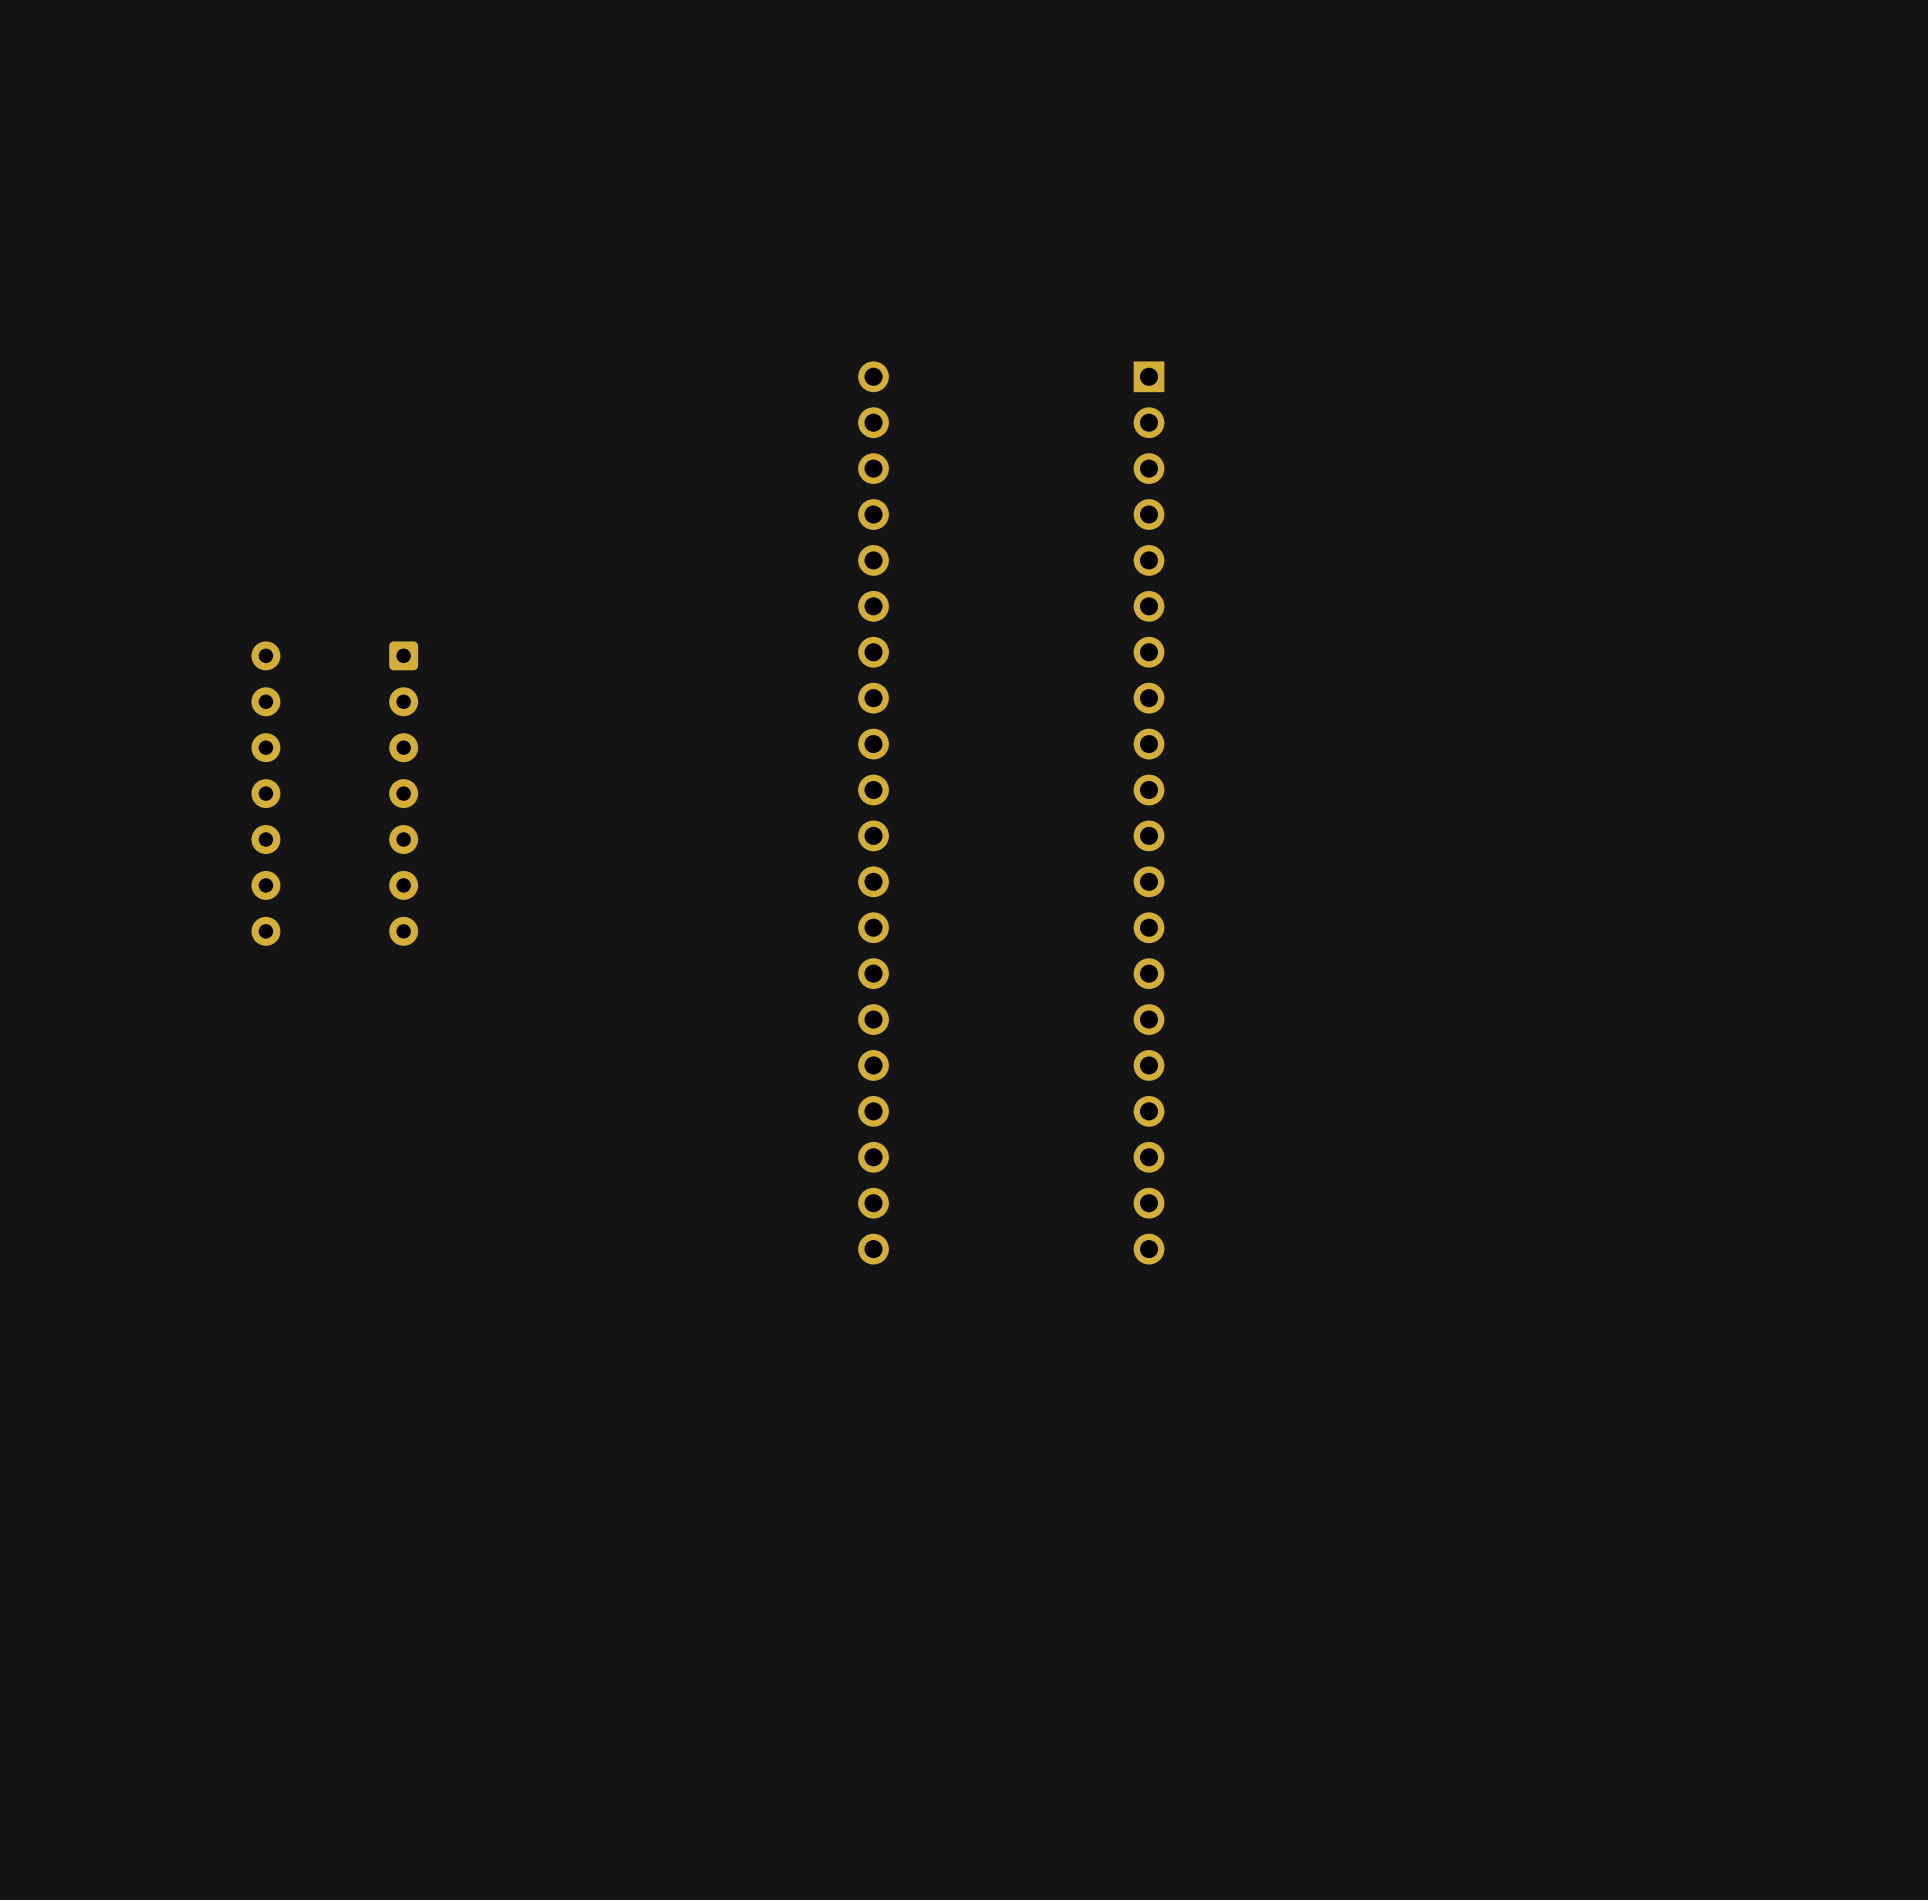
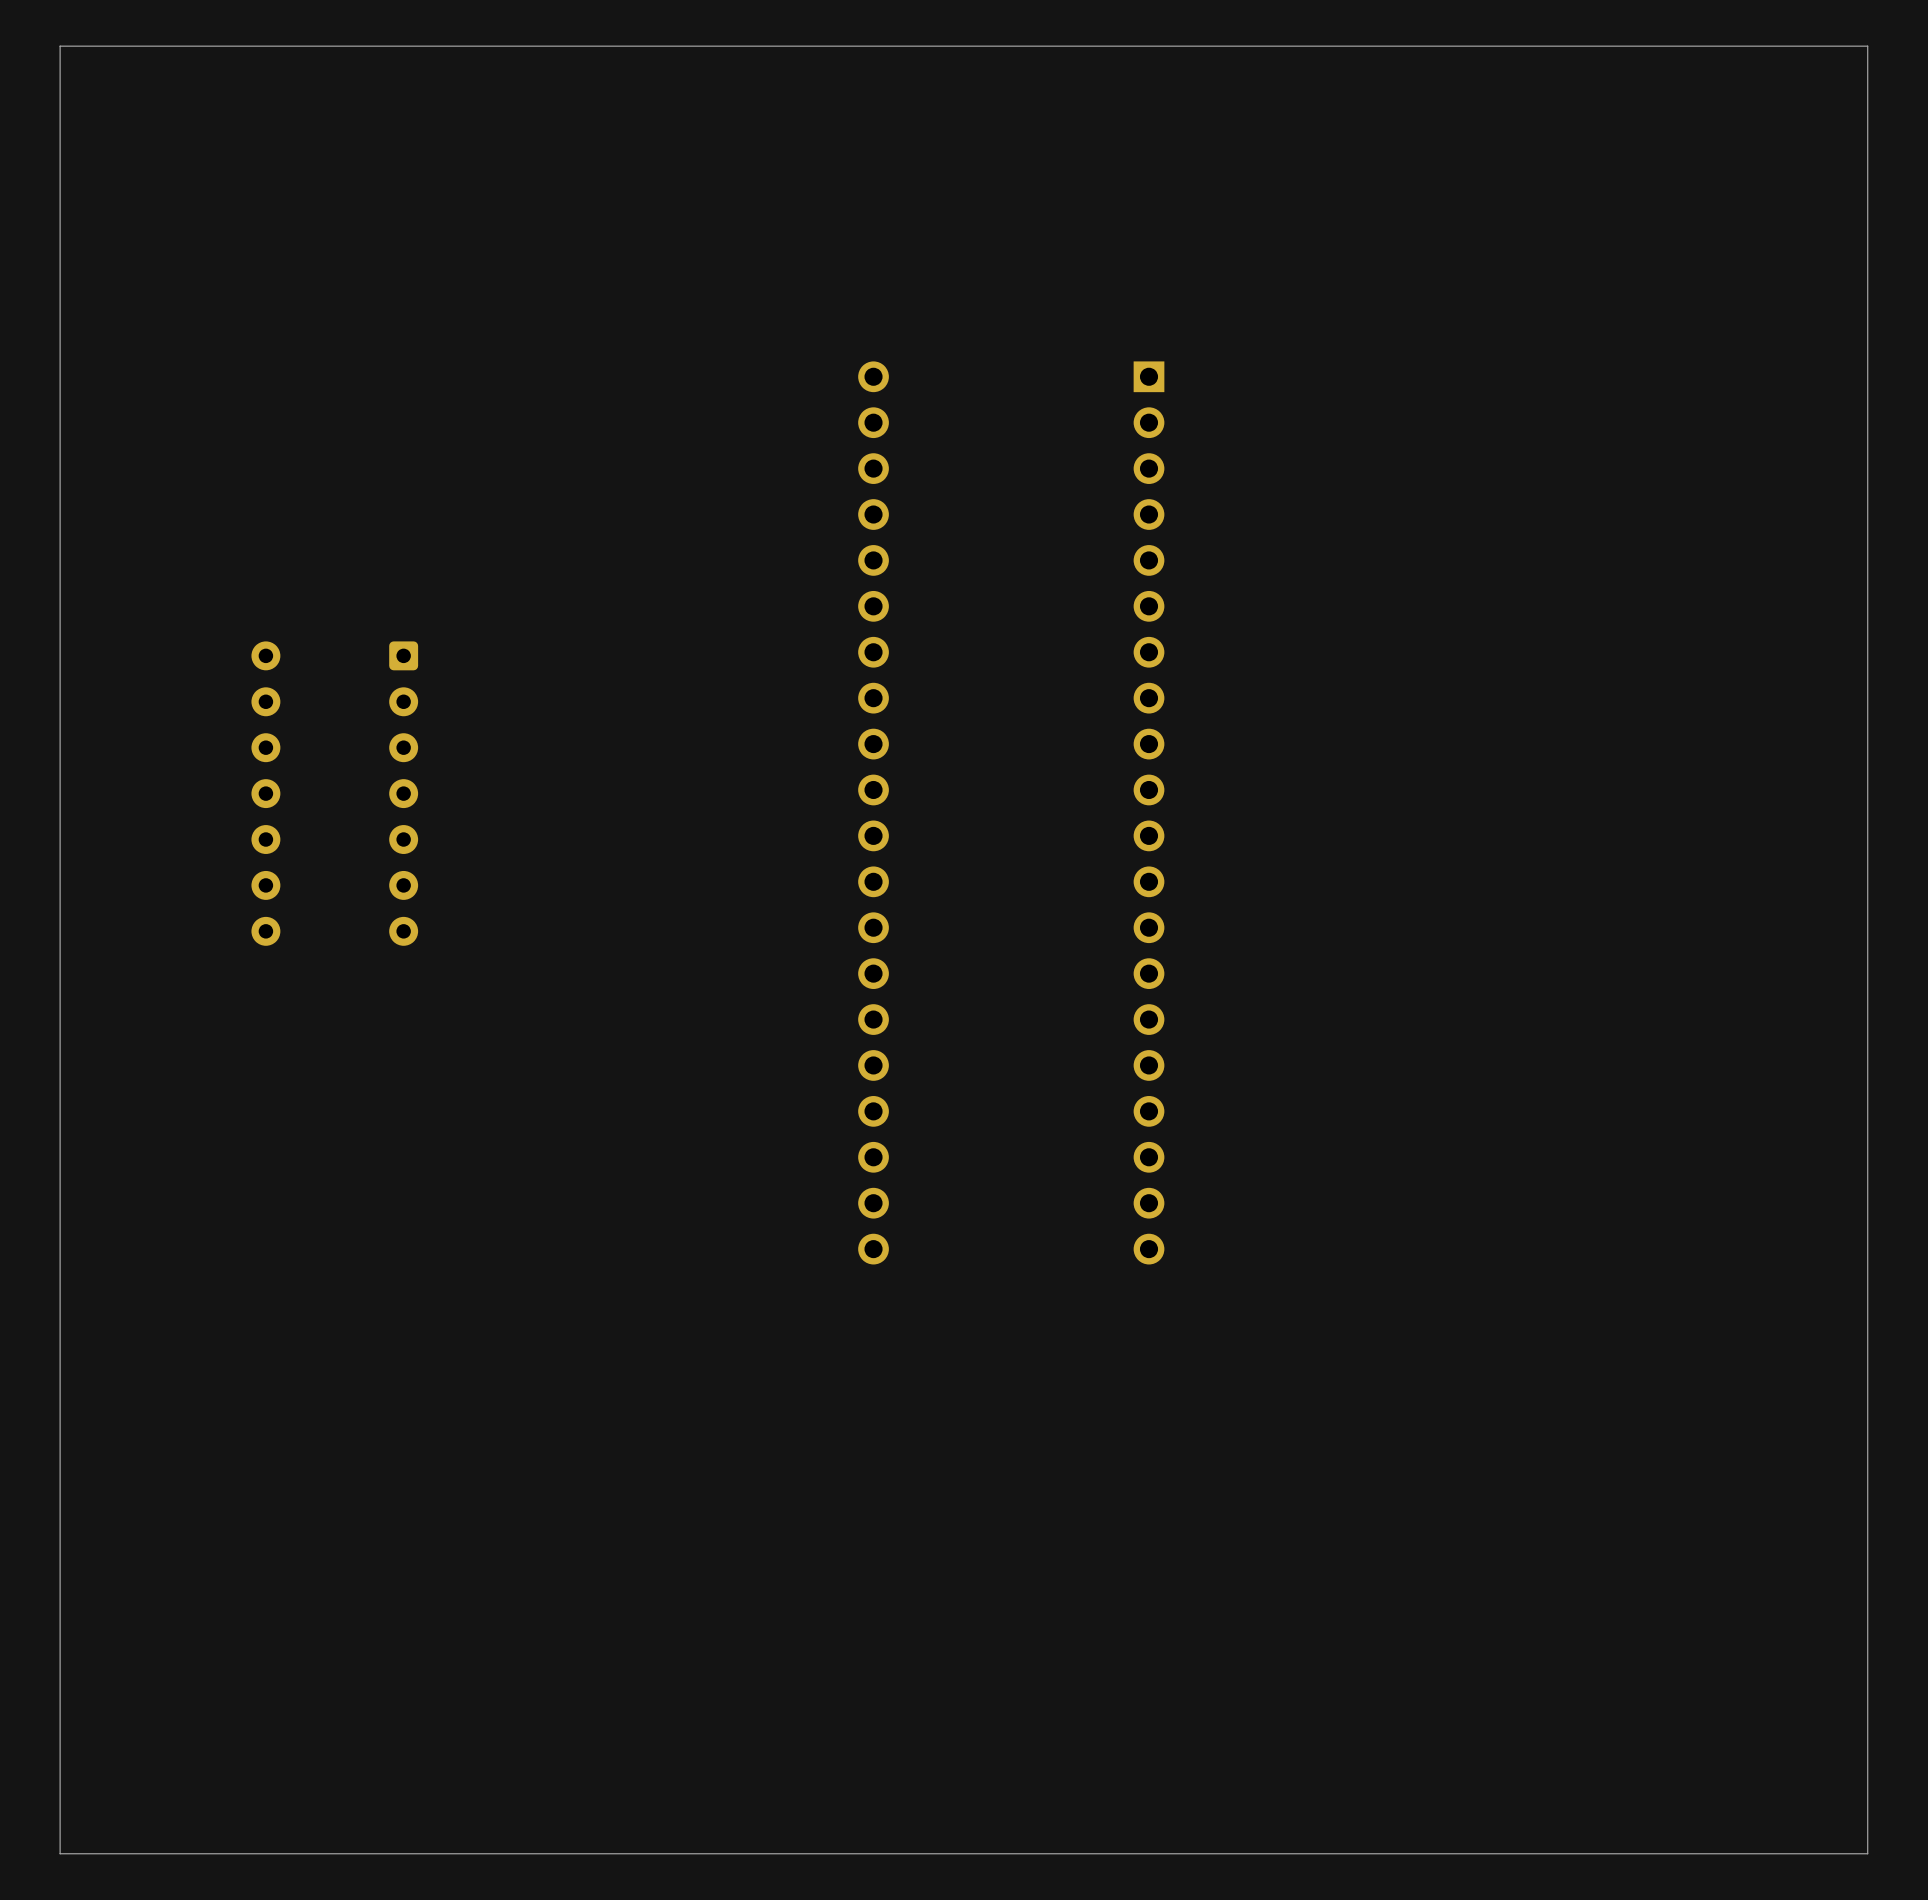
board edge: none -> (1867, 46) (60, 46) (60, 1853) (1867, 1853) (1867, 46)

